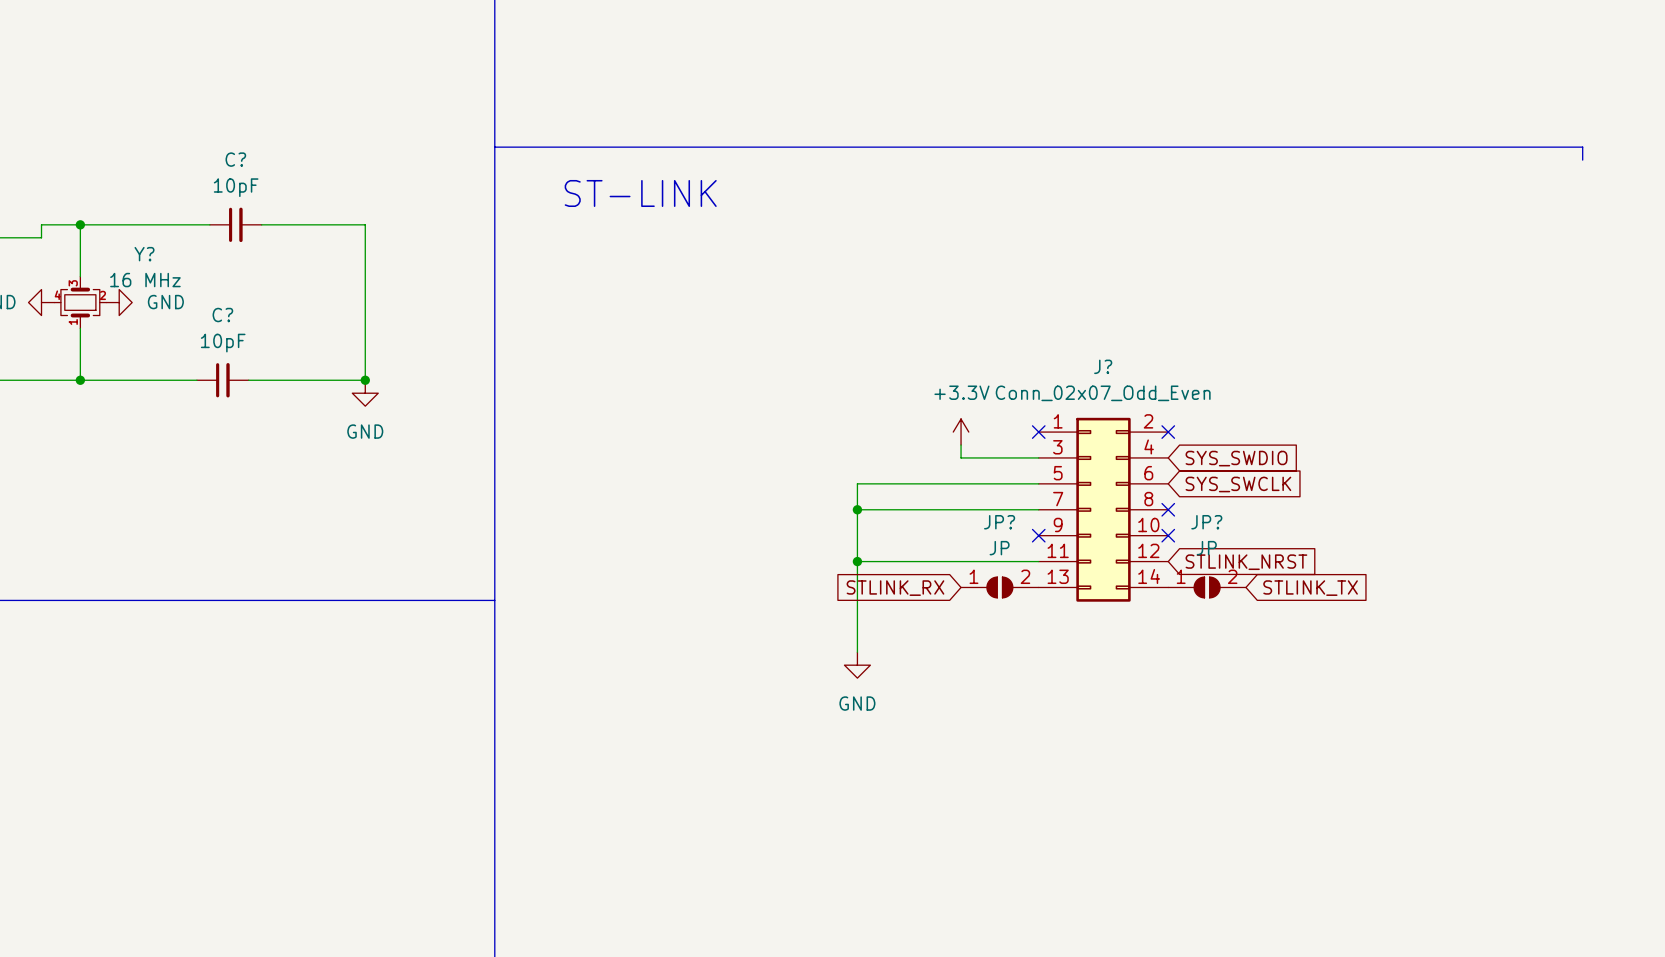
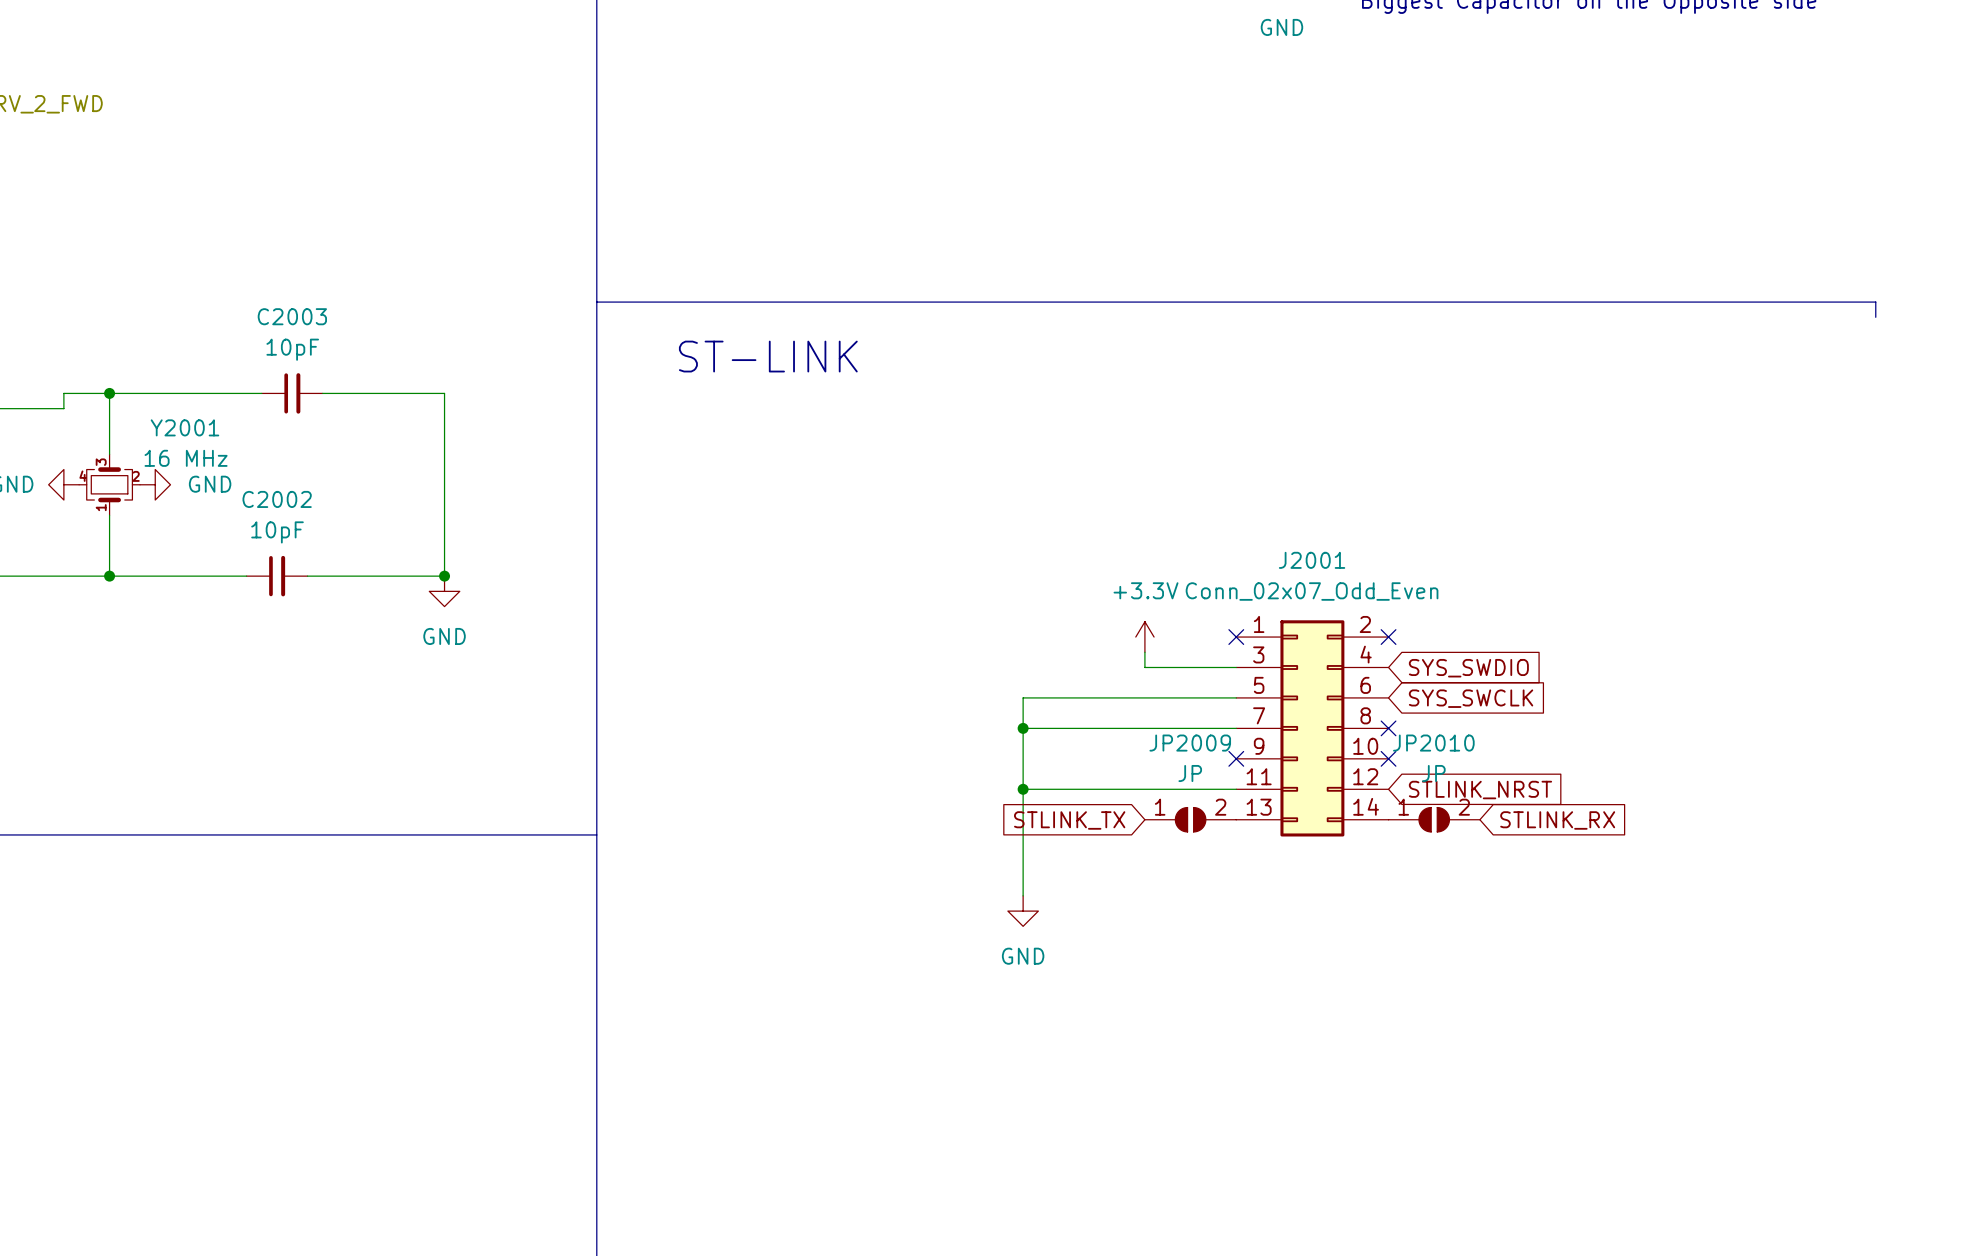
C? name: C? (235, 159) -> C2003 (292, 316)
Y? name: Y? (144, 254) -> Y2001 (184, 427)
C? name: C? (222, 315) -> C2002 (277, 499)
J? name: J? (1103, 366) -> J2001 (1312, 560)
JP? name: JP? (999, 522) -> JP2009 (1190, 743)
JP? name: JP? (1206, 522) -> JP2010 (1433, 743)
global label: STLINK_RX (895, 588) -> STLINK_TX (1069, 820)
global label: STLINK_TX (1310, 588) -> STLINK_RX (1557, 820)

